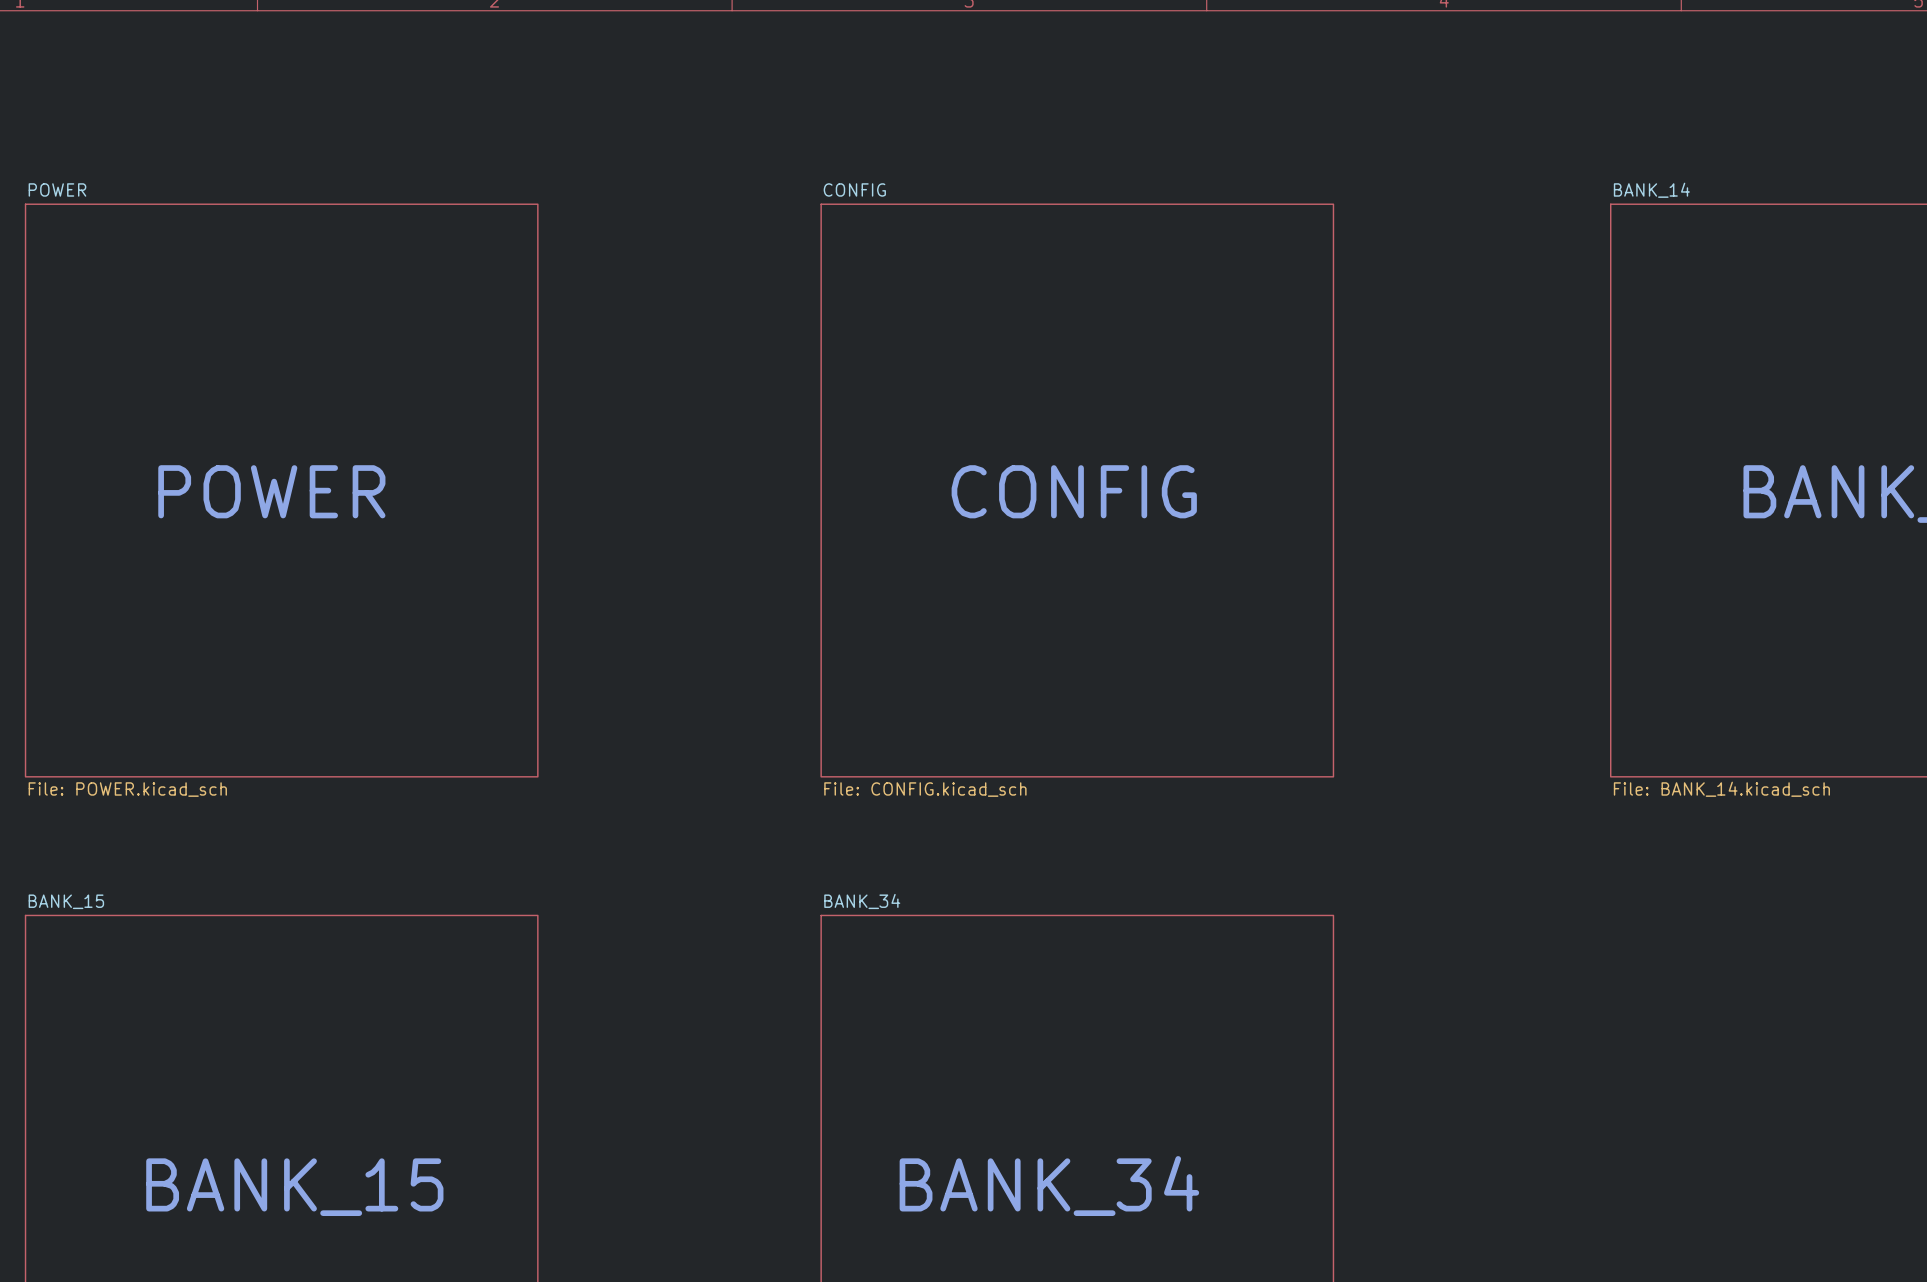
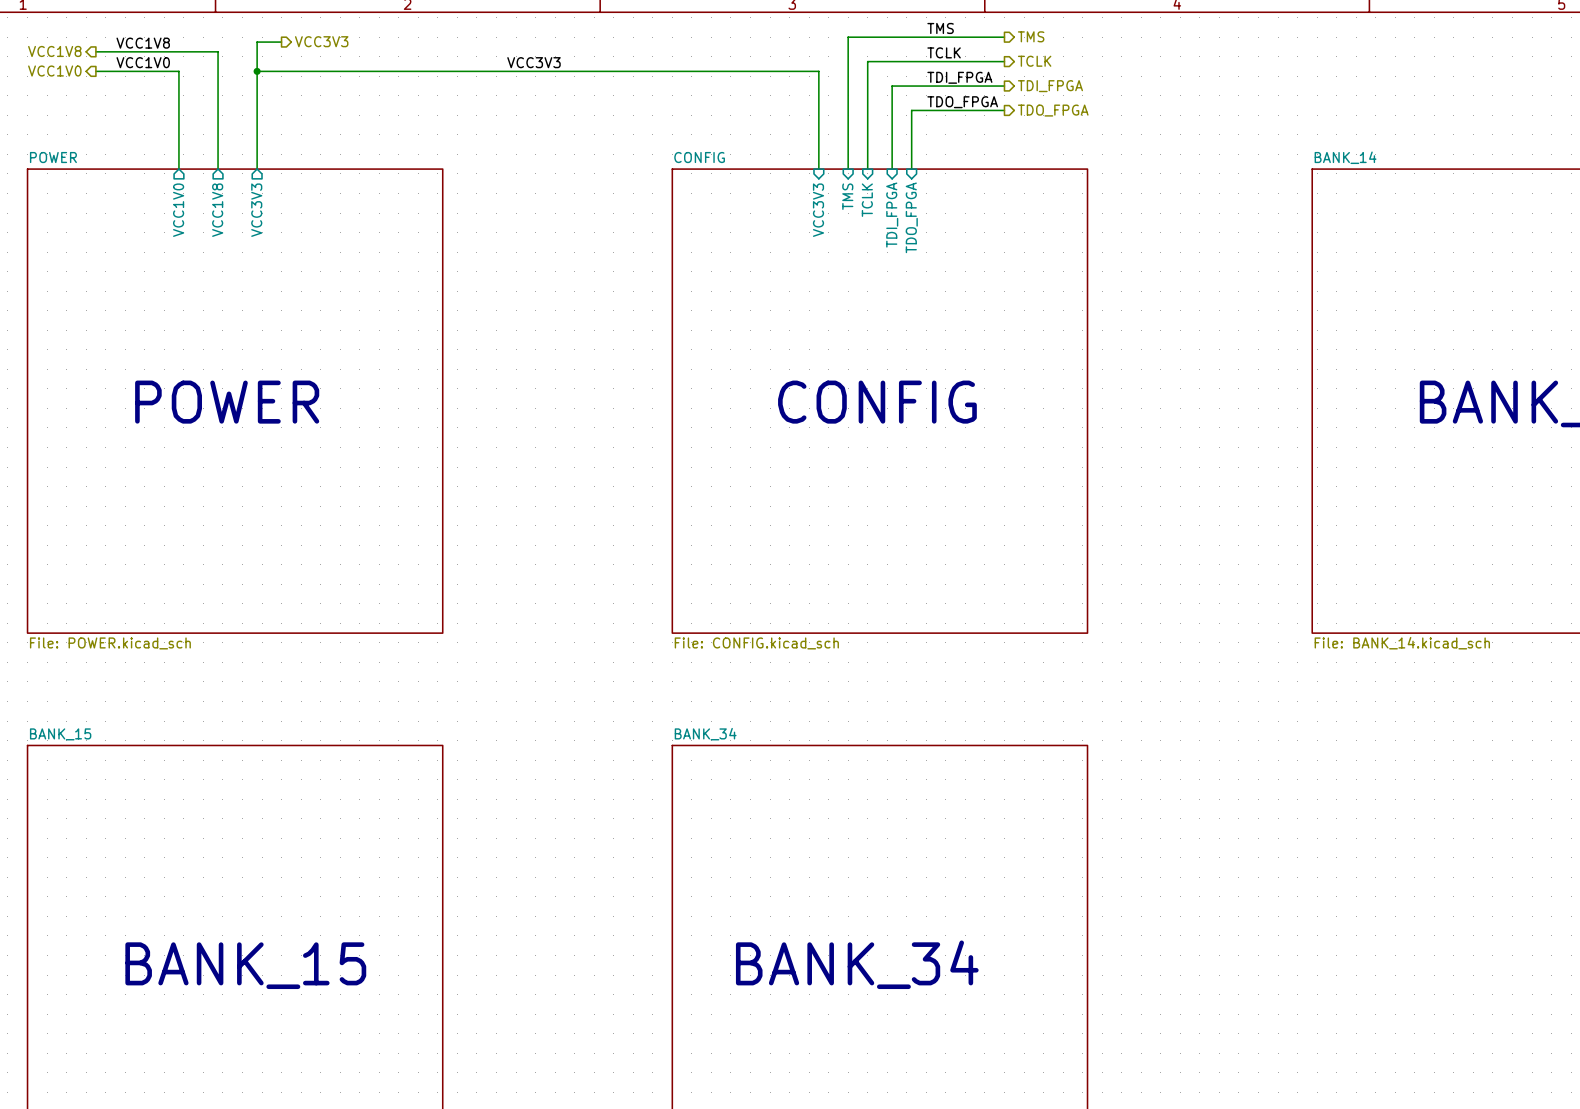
label: none -> TMS (940, 28)
wire: none -> (1004, 37) (848, 37) (848, 169)
hierarchical label: none -> TMS (1031, 36)
wire: none -> (281, 42) (257, 42) (257, 169)
hierarchical label: none -> VCC3V3 (321, 41)
label: none -> VCC1V8 (143, 43)
hierarchical label: none -> VCC1V8 (54, 51)
wire: none -> (95, 51) (218, 51) (218, 169)
label: none -> TCLK (944, 52)
wire: none -> (1004, 61) (867, 61) (867, 169)
hierarchical label: none -> TCLK (1034, 61)
label: none -> VCC1V0 (143, 62)
label: none -> VCC3V3 (533, 62)
hierarchical label: none -> VCC1V0 (54, 71)
wire: none -> (95, 71) (178, 71) (178, 169)
wire: none -> (257, 71) (818, 71) (818, 169)
junction: none -> (257, 71)
label: none -> TDI_FPGA (959, 77)
wire: none -> (1004, 86) (892, 86) (892, 169)
hierarchical label: none -> TDI_FPGA (1050, 86)
label: none -> TDO_FPGA (962, 102)
wire: none -> (1004, 110) (911, 110) (911, 169)
hierarchical label: none -> TDO_FPGA (1053, 110)
sheet pin: none -> TMS (847, 196)
sheet pin: none -> TCLK (867, 200)
sheet pin: none -> VCC1V0 (178, 210)
sheet pin: none -> VCC1V8 (217, 210)
sheet pin: none -> VCC3V3 (256, 210)
sheet pin: none -> VCC3V3 (818, 210)
sheet pin: none -> TDI_FPGA (892, 215)
sheet pin: none -> TDO_FPGA (911, 217)

